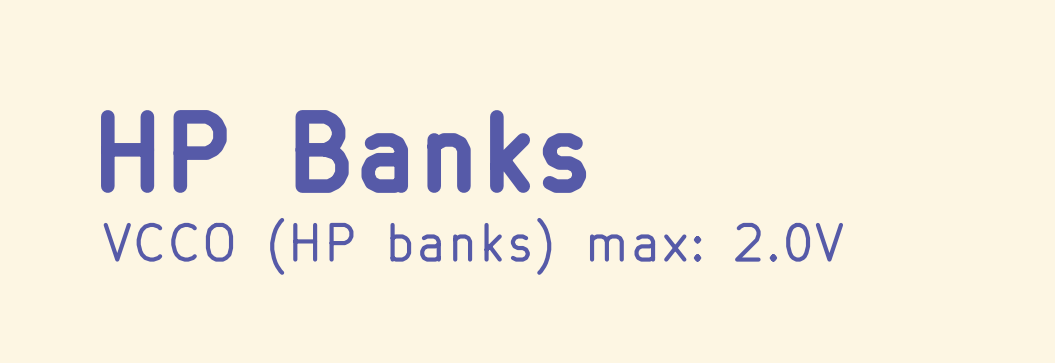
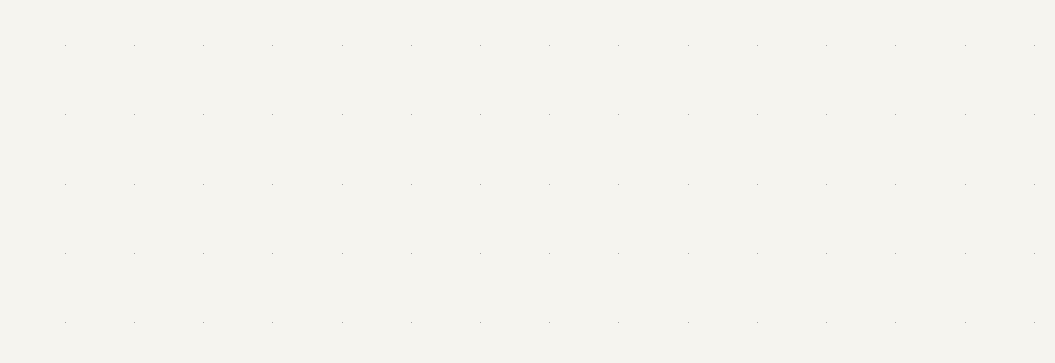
text: HP Banks (343, 151) -> none
text: VCCO (HP banks) max: 2.0V (473, 246) -> none

